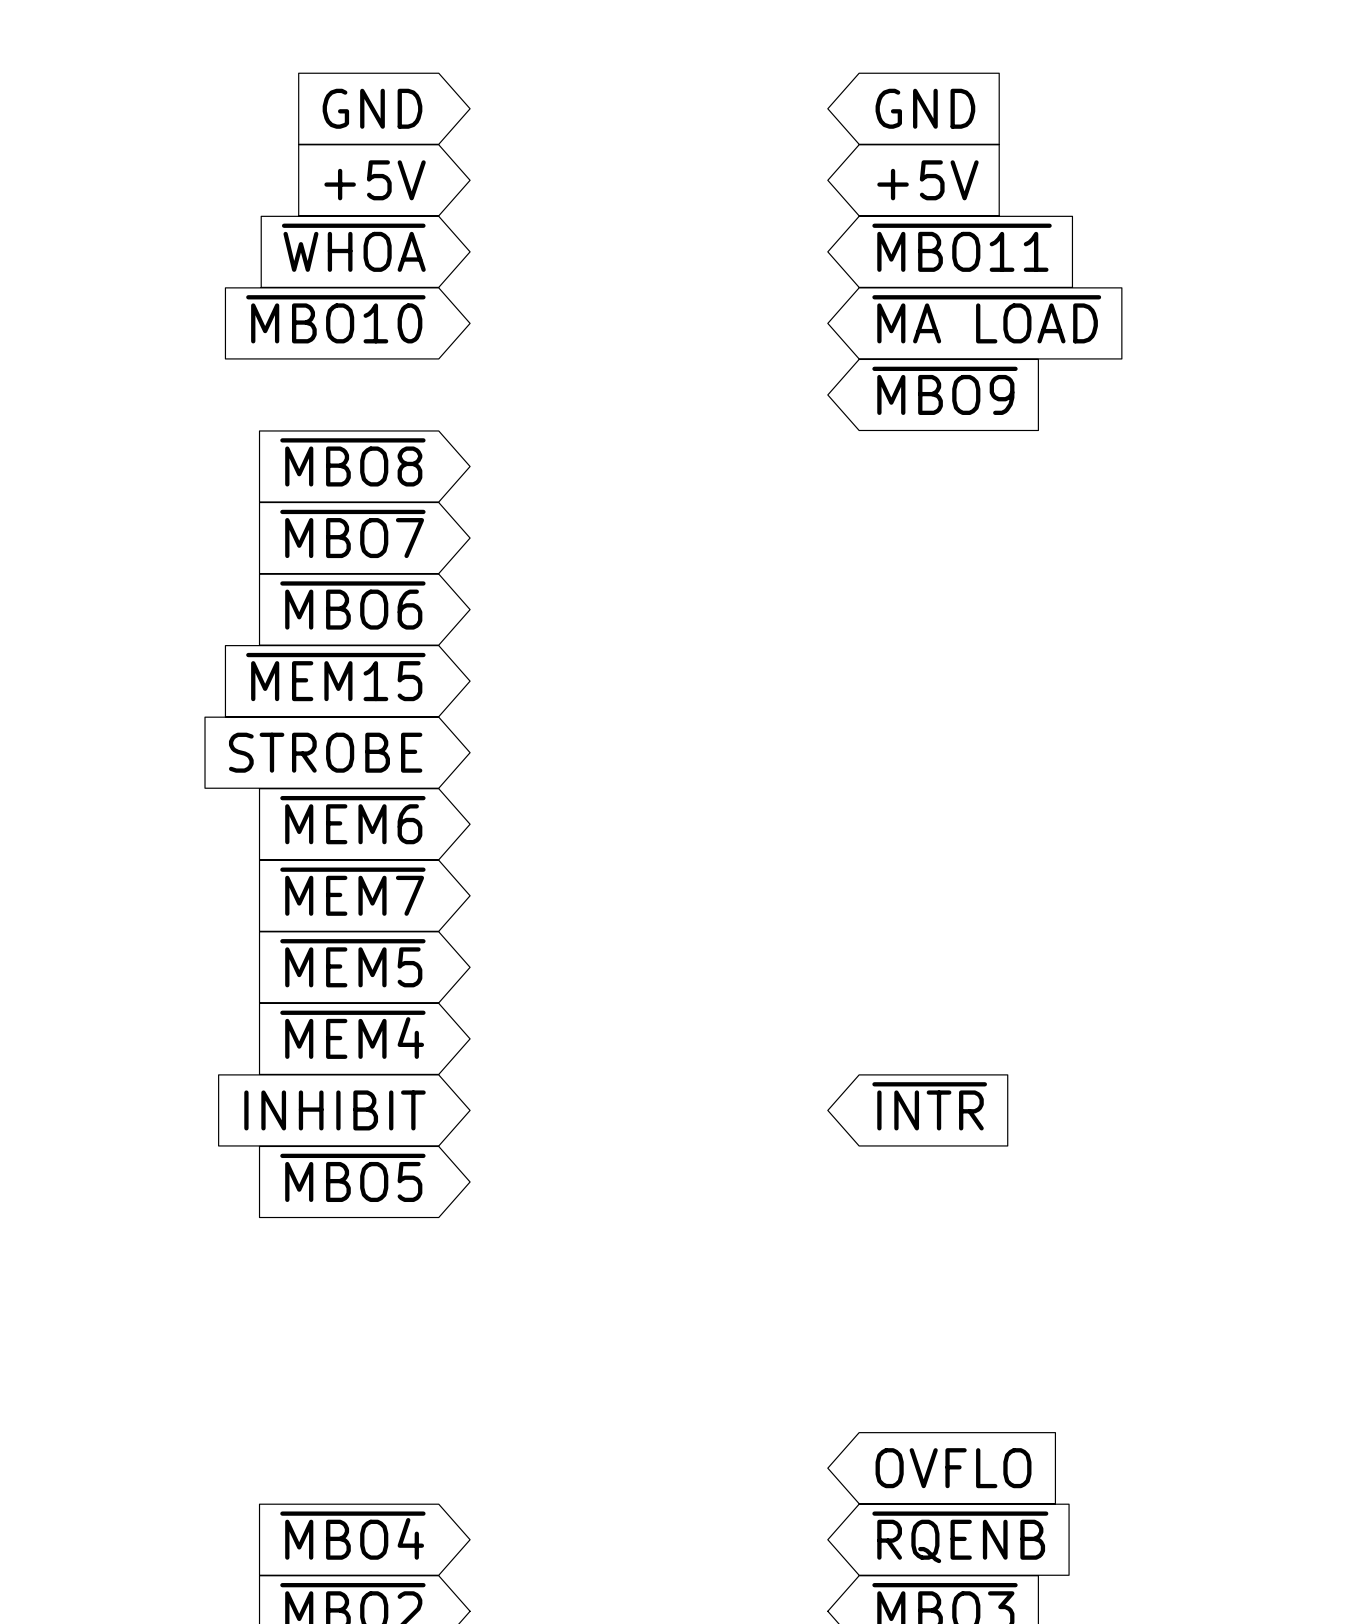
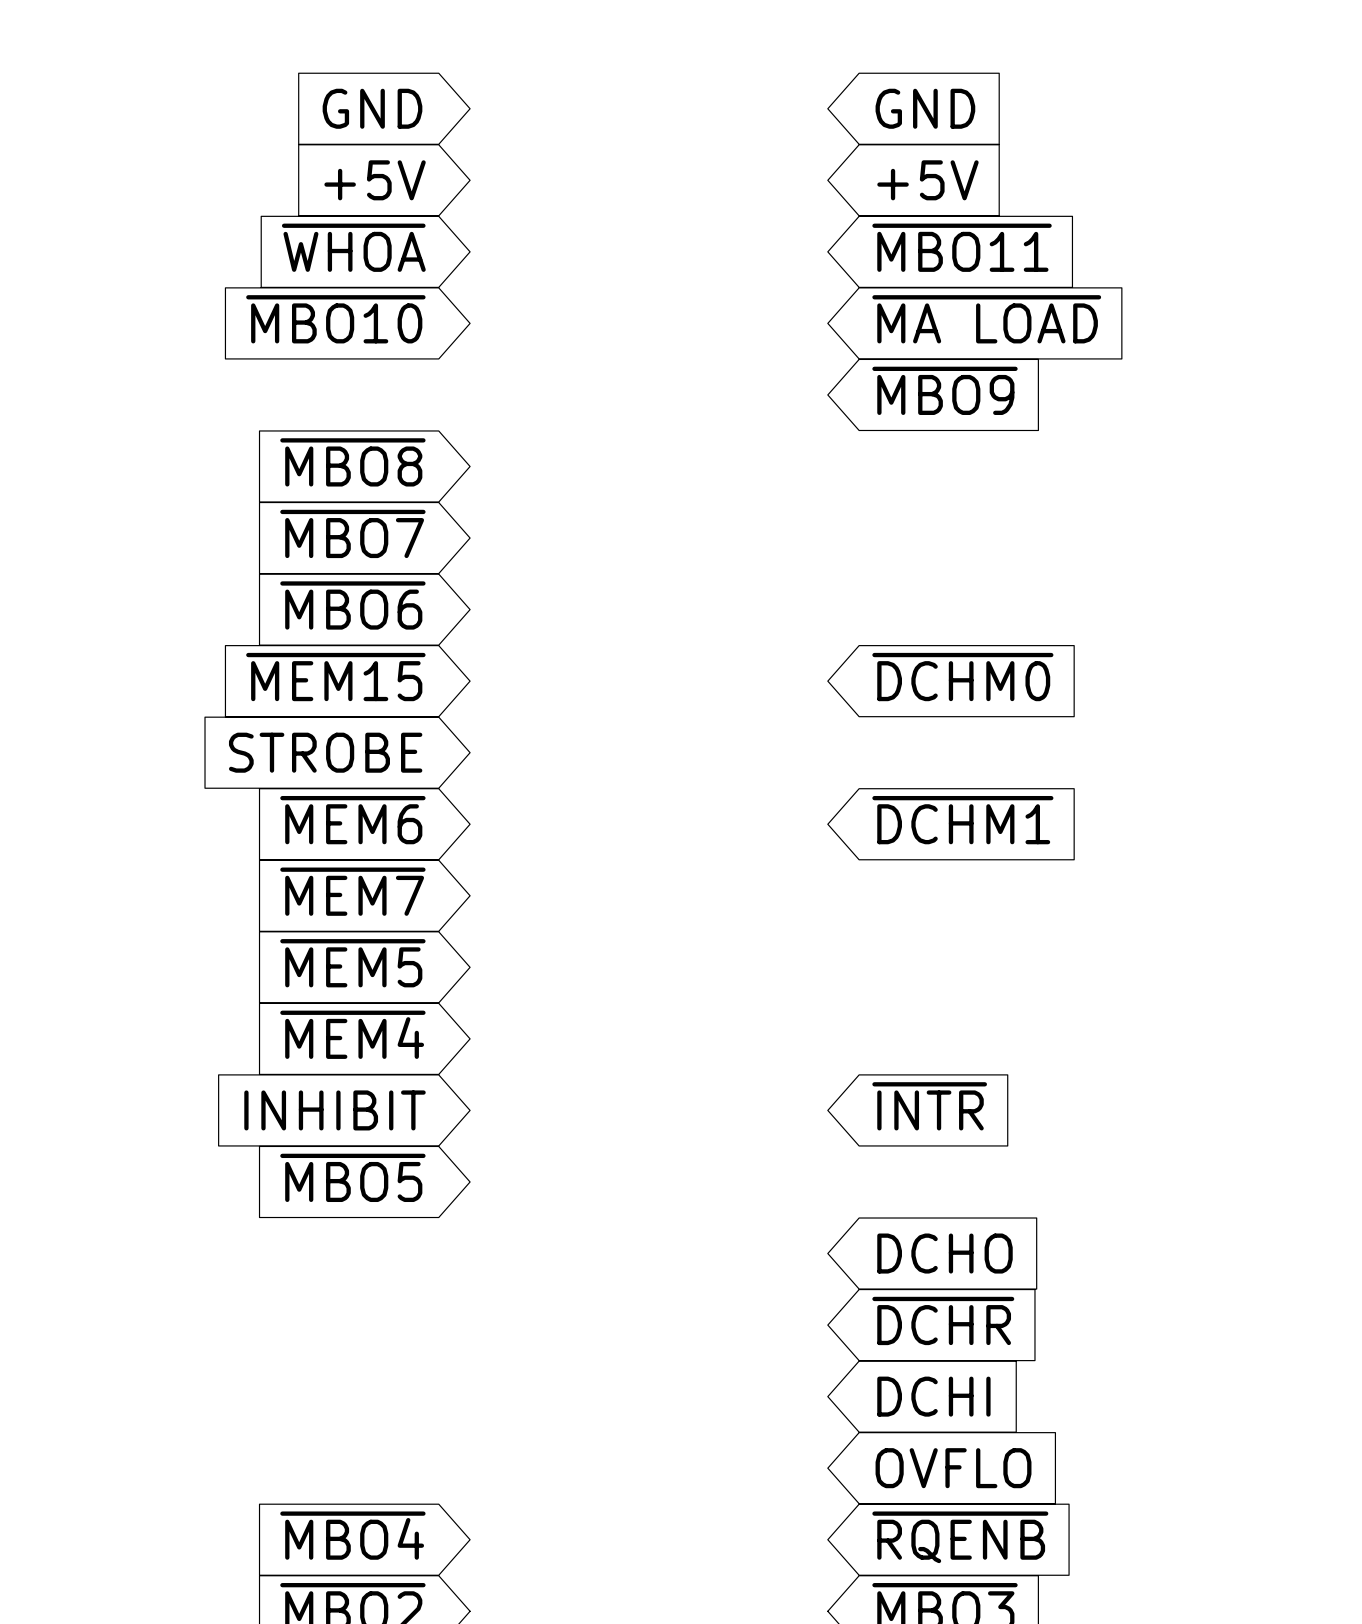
global label: none -> ~{DCHM0} (962, 677)
global label: none -> ~{DCHM1} (962, 820)
global label: none -> DCHO (944, 1253)
global label: none -> ~{DCHR} (943, 1320)
global label: none -> DCHI (933, 1396)

